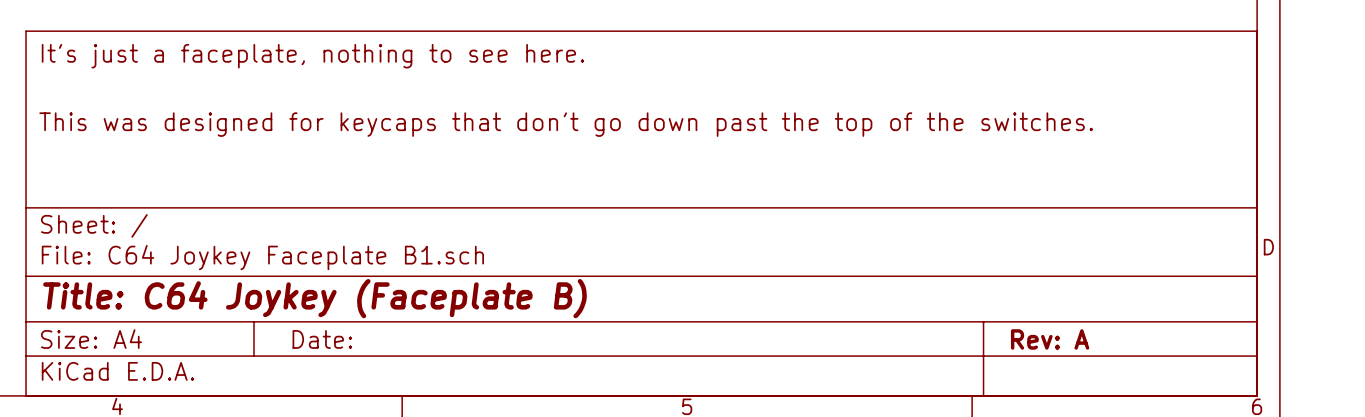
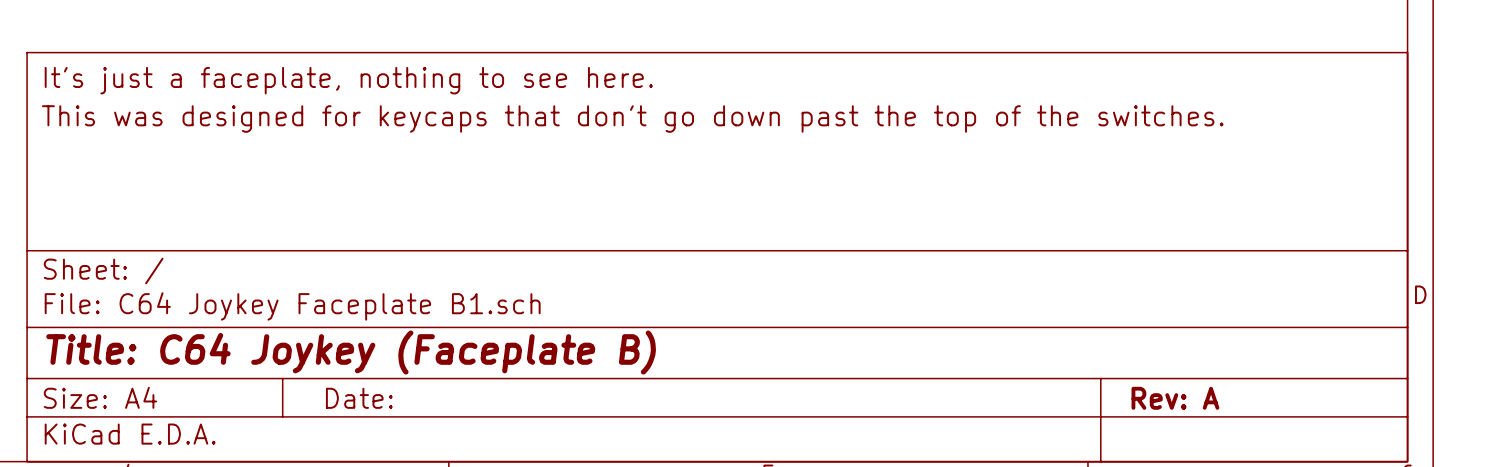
title block position: This was designed for keycaps that don't go down past the top of the switches. (566, 124) -> This was designed for keycaps that don't go down past the top of the switches. (632, 118)

